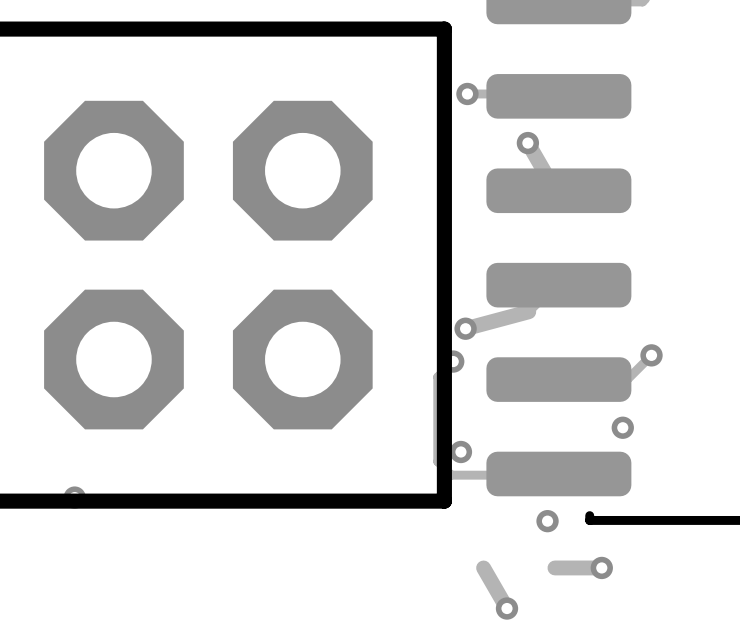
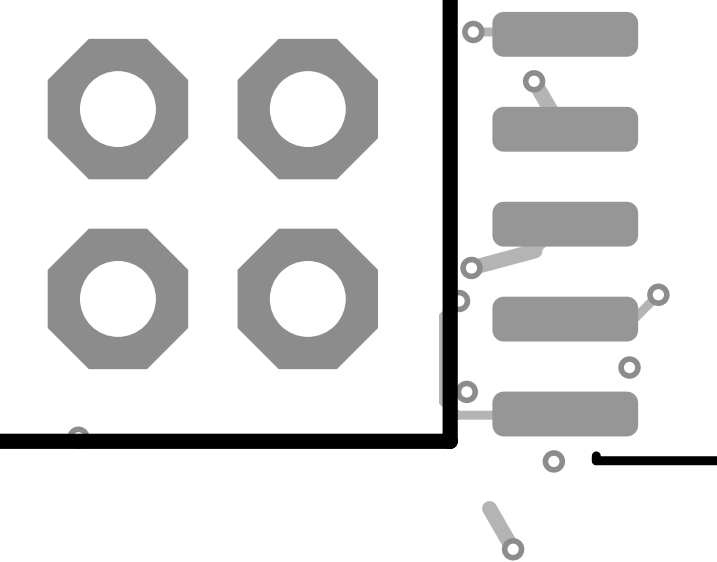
track: (554, 567) (601, 567) -> none
via: (601, 567) -> none

